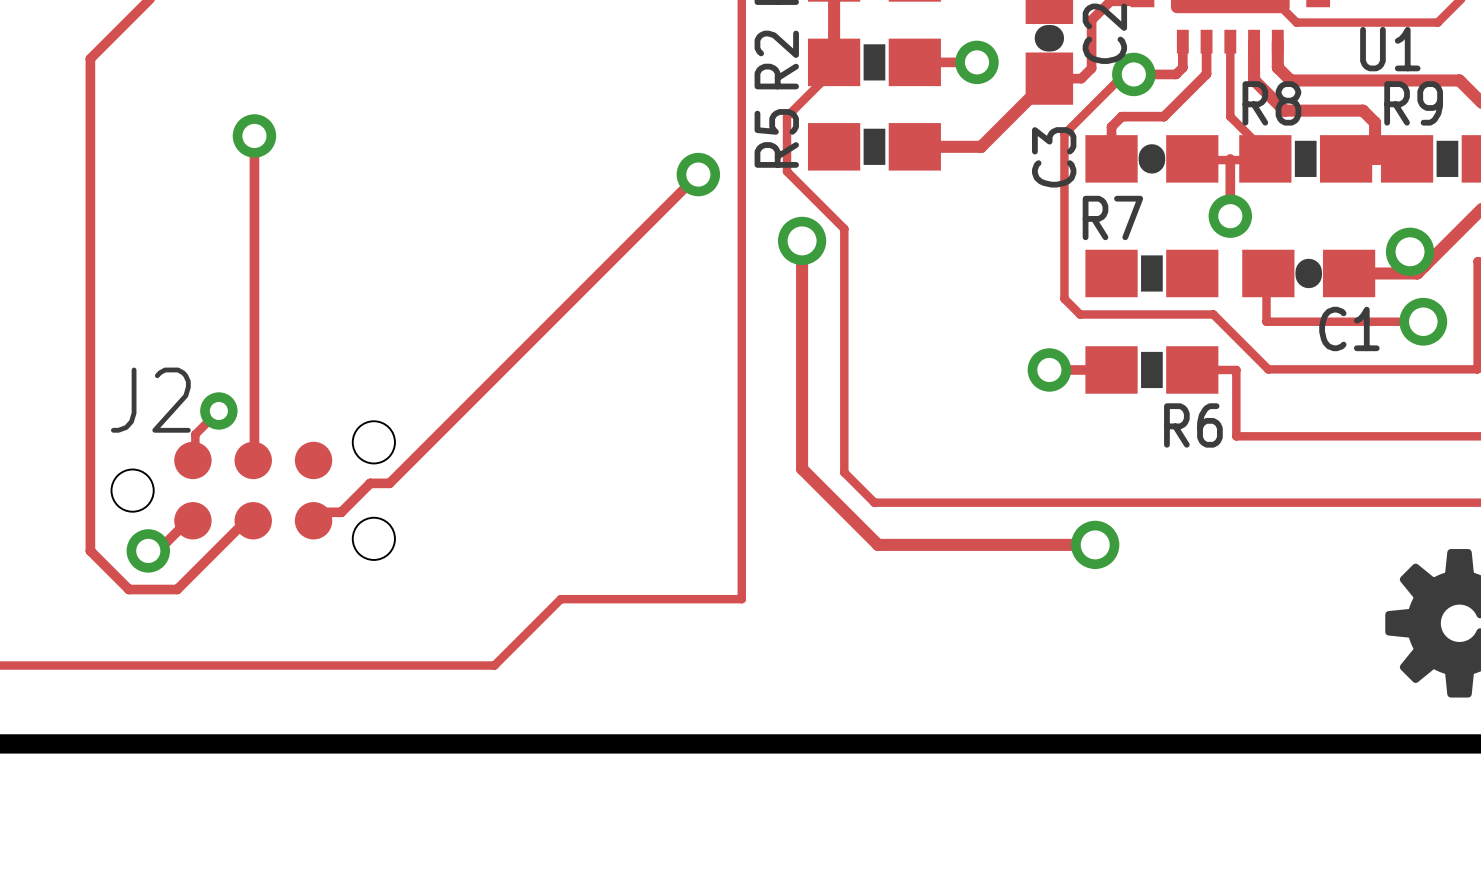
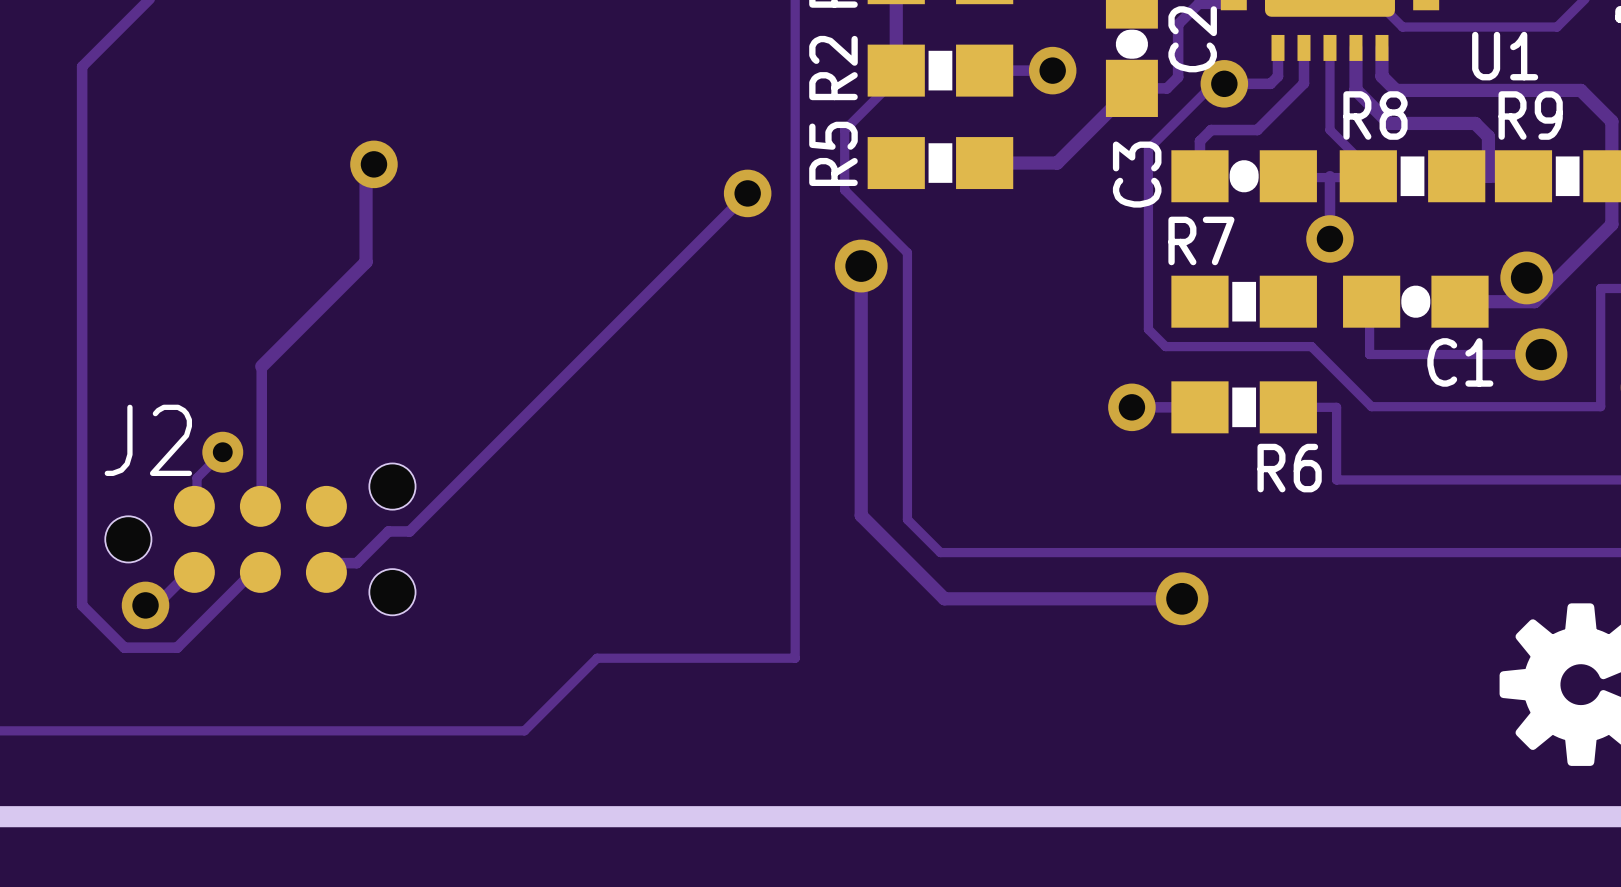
track: (254, 135) (254, 332) -> (373, 164) (366, 172) (366, 262) (261, 366)
via position: (254, 135) -> (373, 164)

